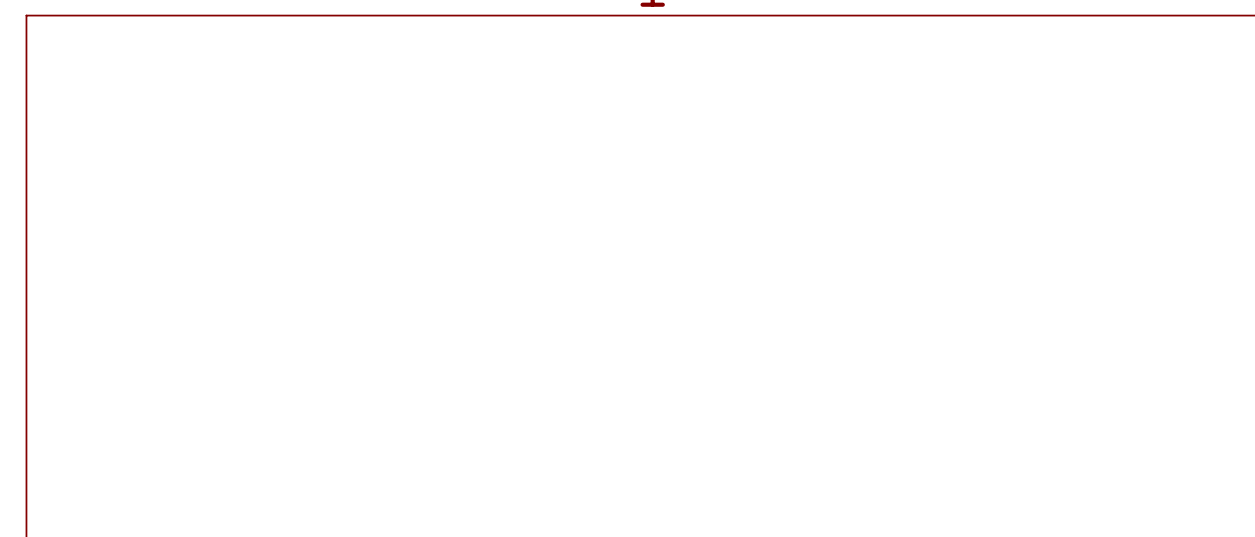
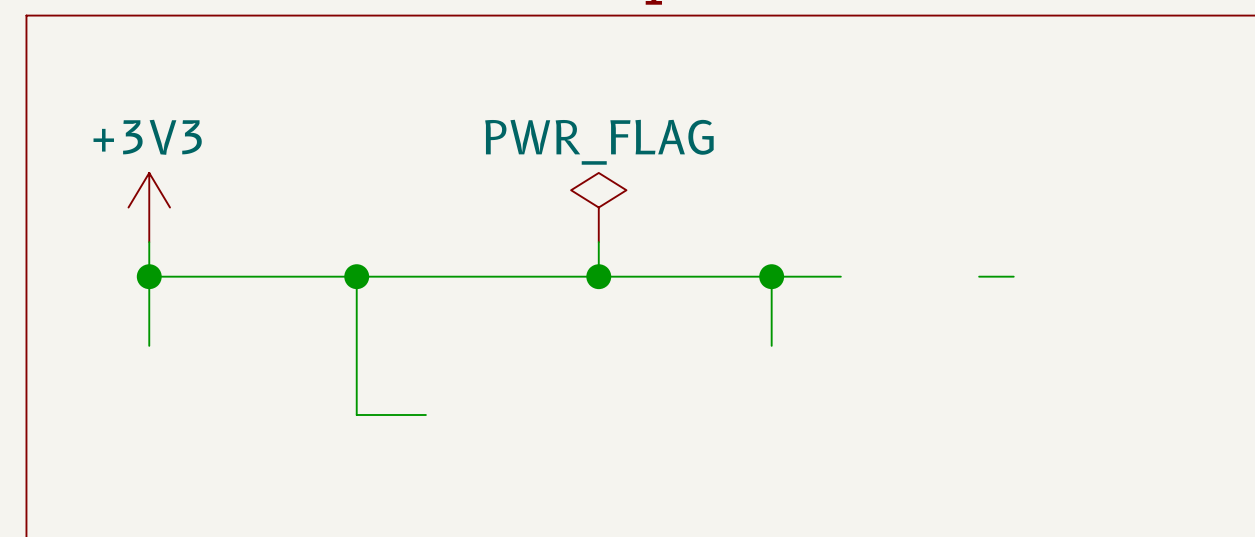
power symbol: none -> +3V3 (149, 207)
power symbol: none -> PWR_FLAG (598, 207)
wire: none -> (149, 242) (149, 345)
wire: none -> (598, 242) (598, 276)
wire: none -> (149, 276) (840, 276)
junction: none -> (149, 276)
wire: none -> (356, 276) (356, 414) (425, 414)
junction: none -> (356, 276)
junction: none -> (598, 276)
wire: none -> (771, 276) (771, 345)
junction: none -> (771, 276)
wire: none -> (979, 276) (1013, 276)

